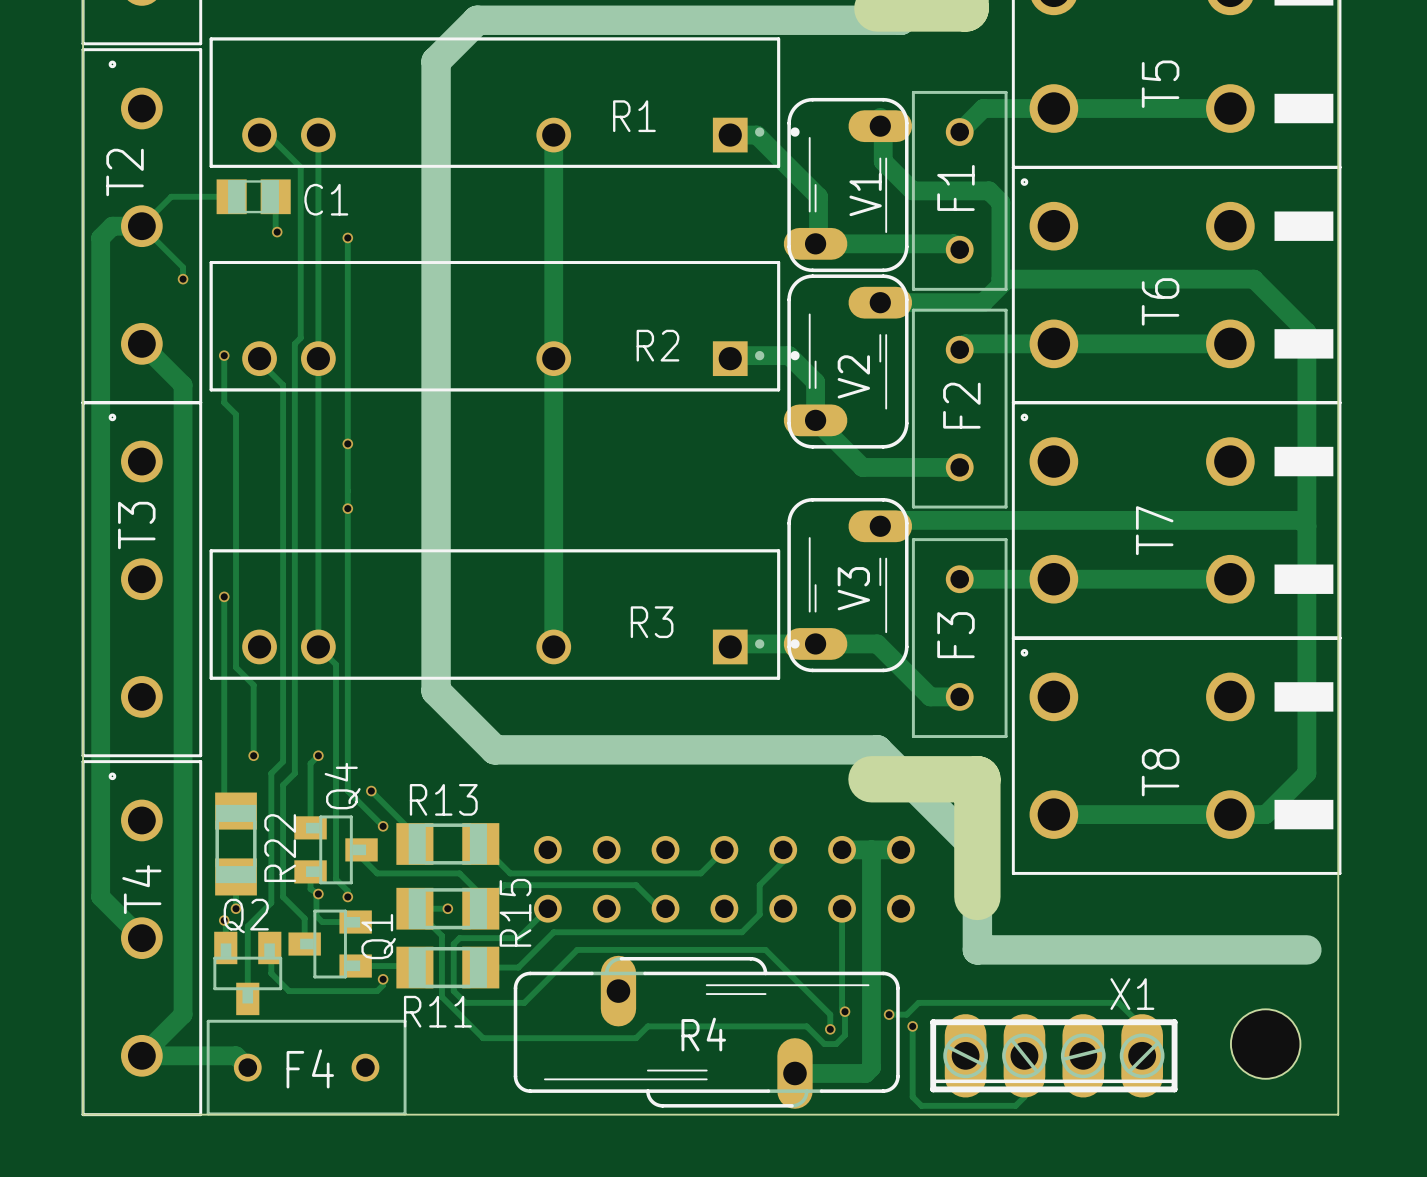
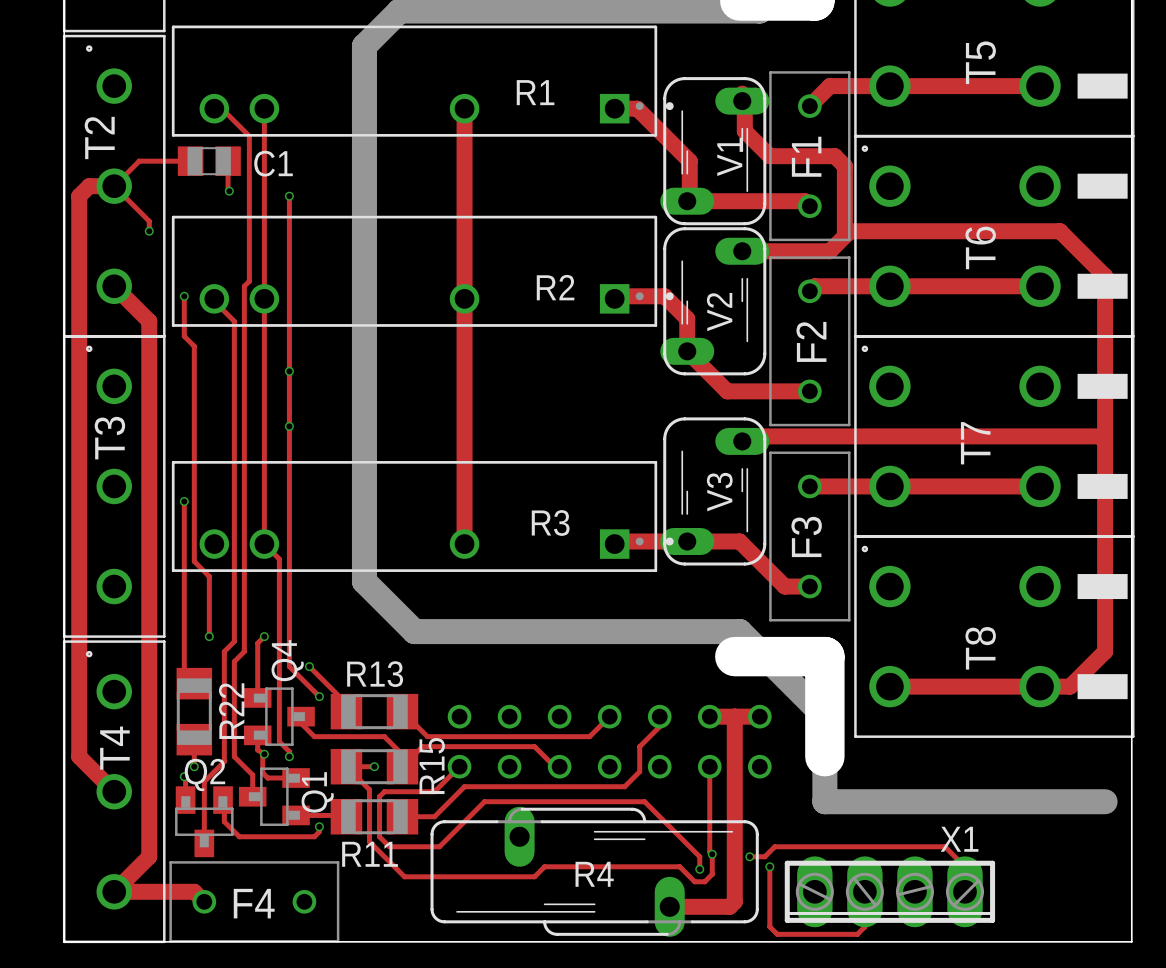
hole: (1265, 1044) -> none

